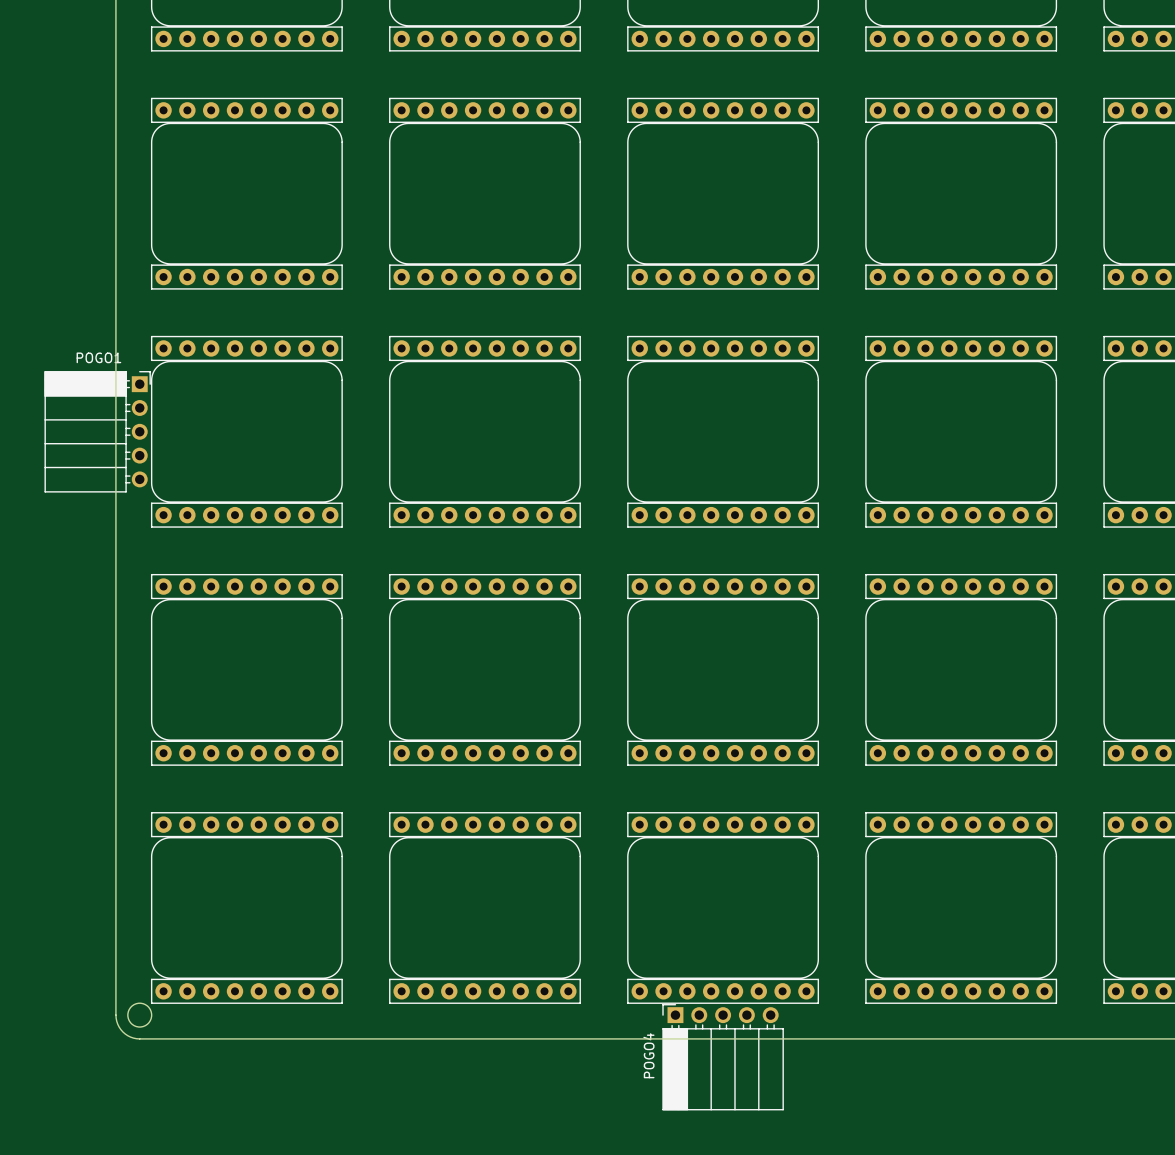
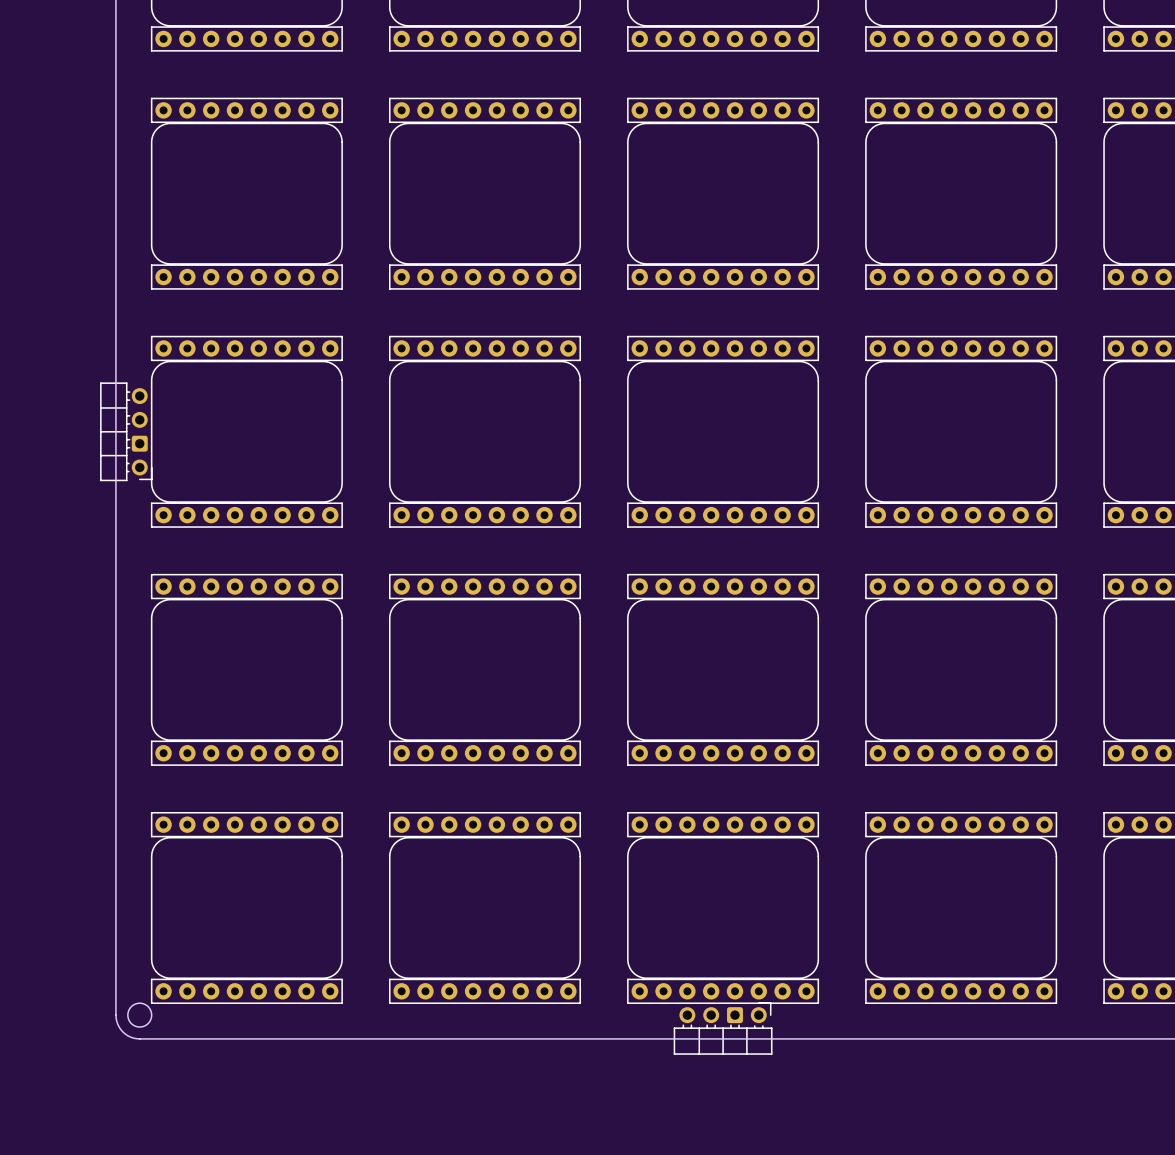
POGO1: (97, 431) -> none
part: none -> (126, 431)
part: none -> (723, 1028)
POGO4: (723, 1057) -> none

